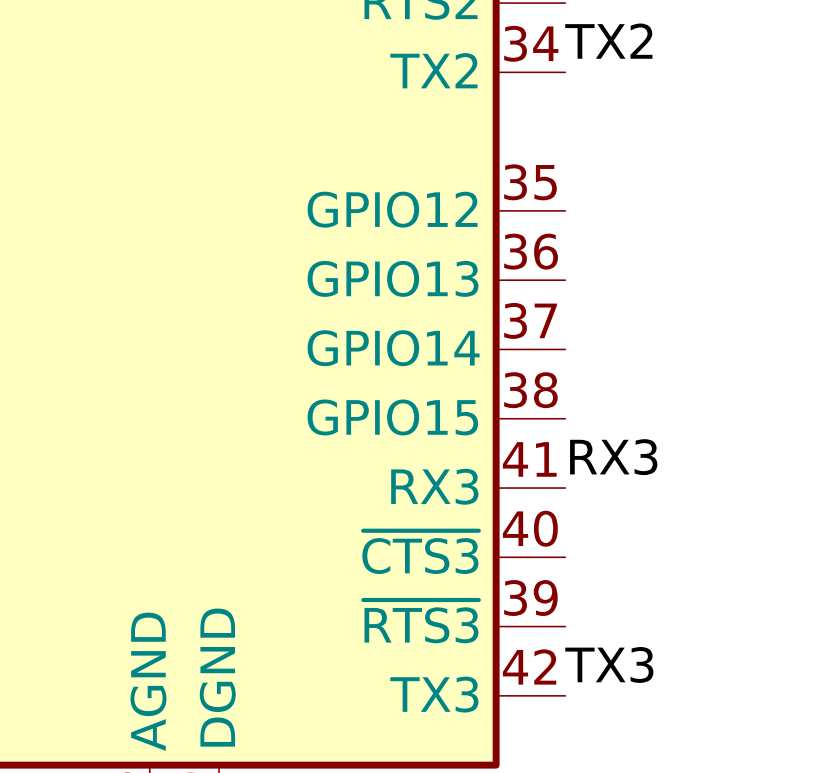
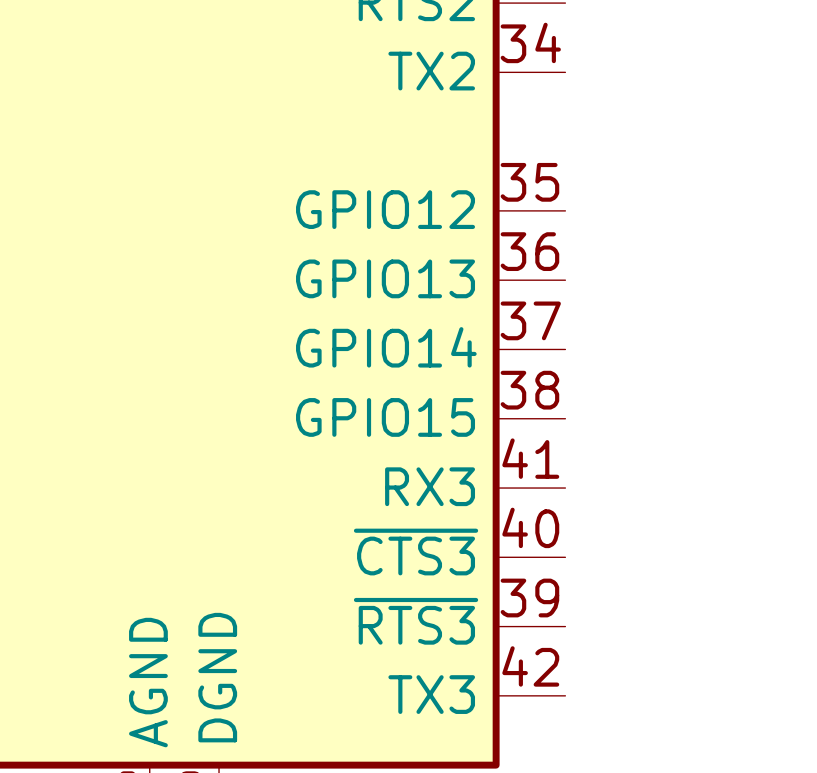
label: TX2 (608, 41) -> none
label: RX3 (613, 457) -> none
label: TX3 (609, 664) -> none

